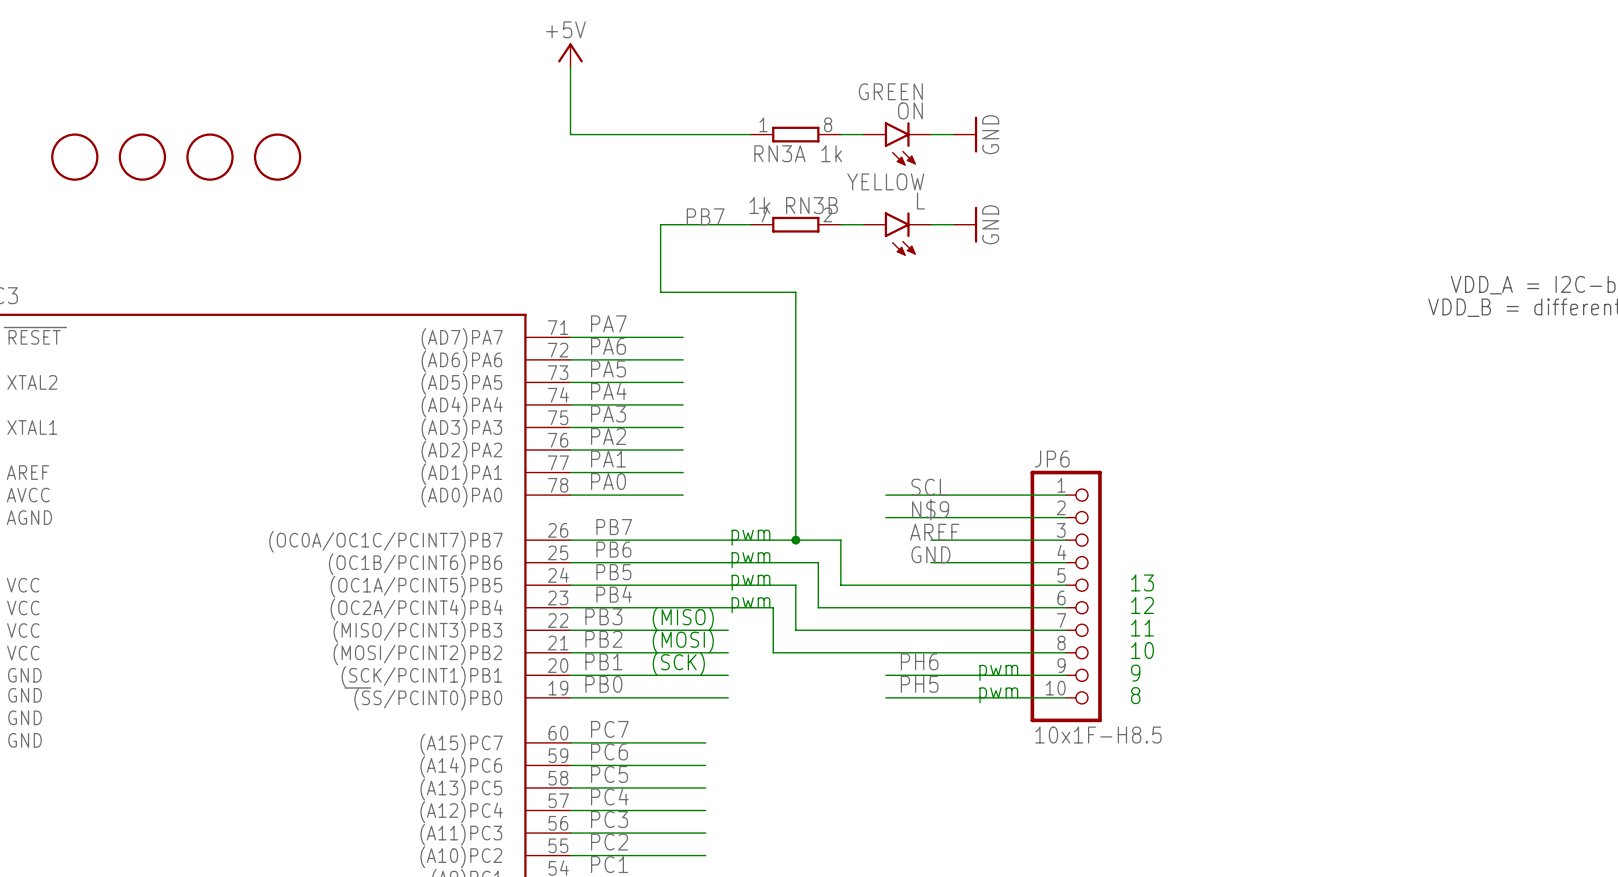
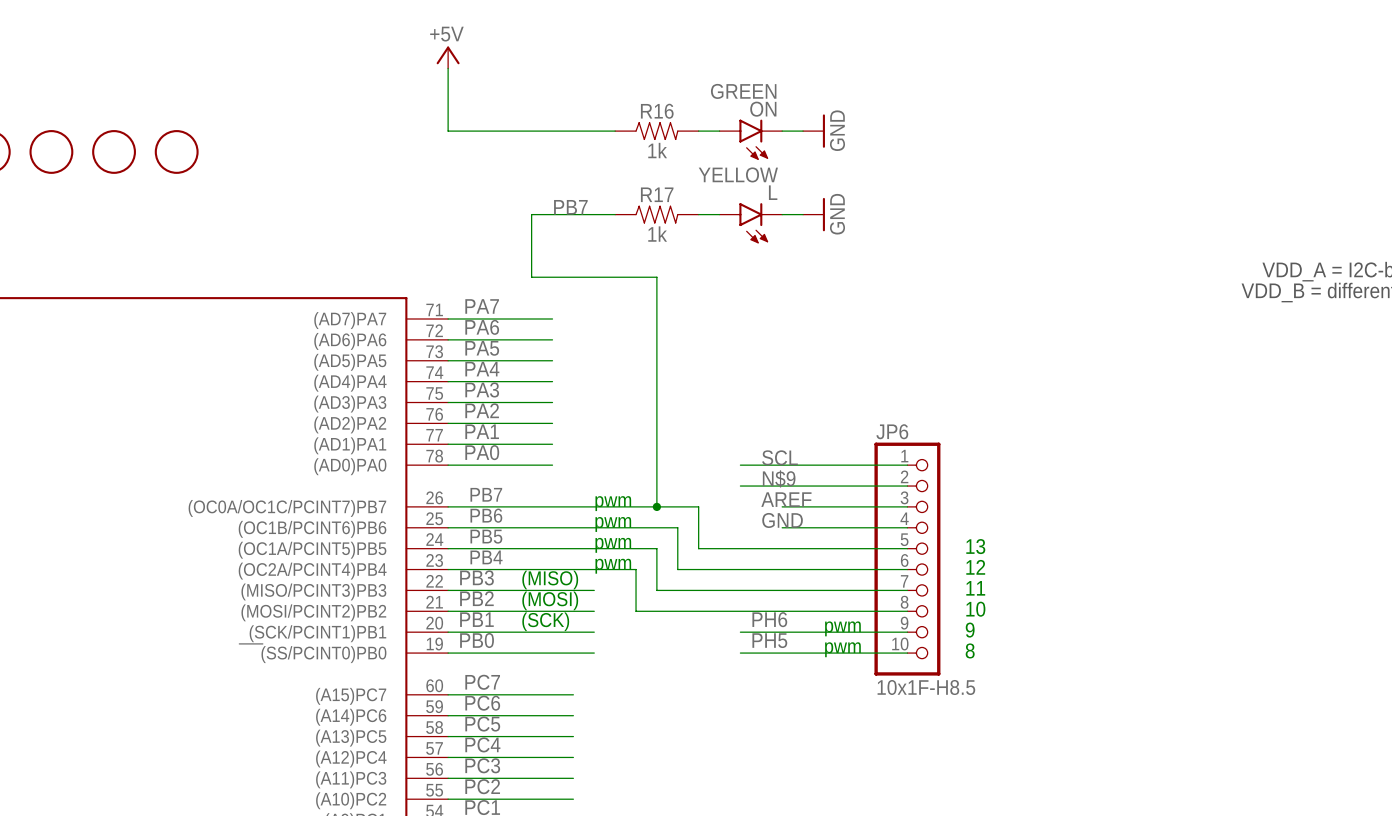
RN3A: 1k (795, 134) -> none
R16: none -> 1k (656, 131)
RN3B: 1k (795, 224) -> none
R17: none -> 1k (656, 214)

